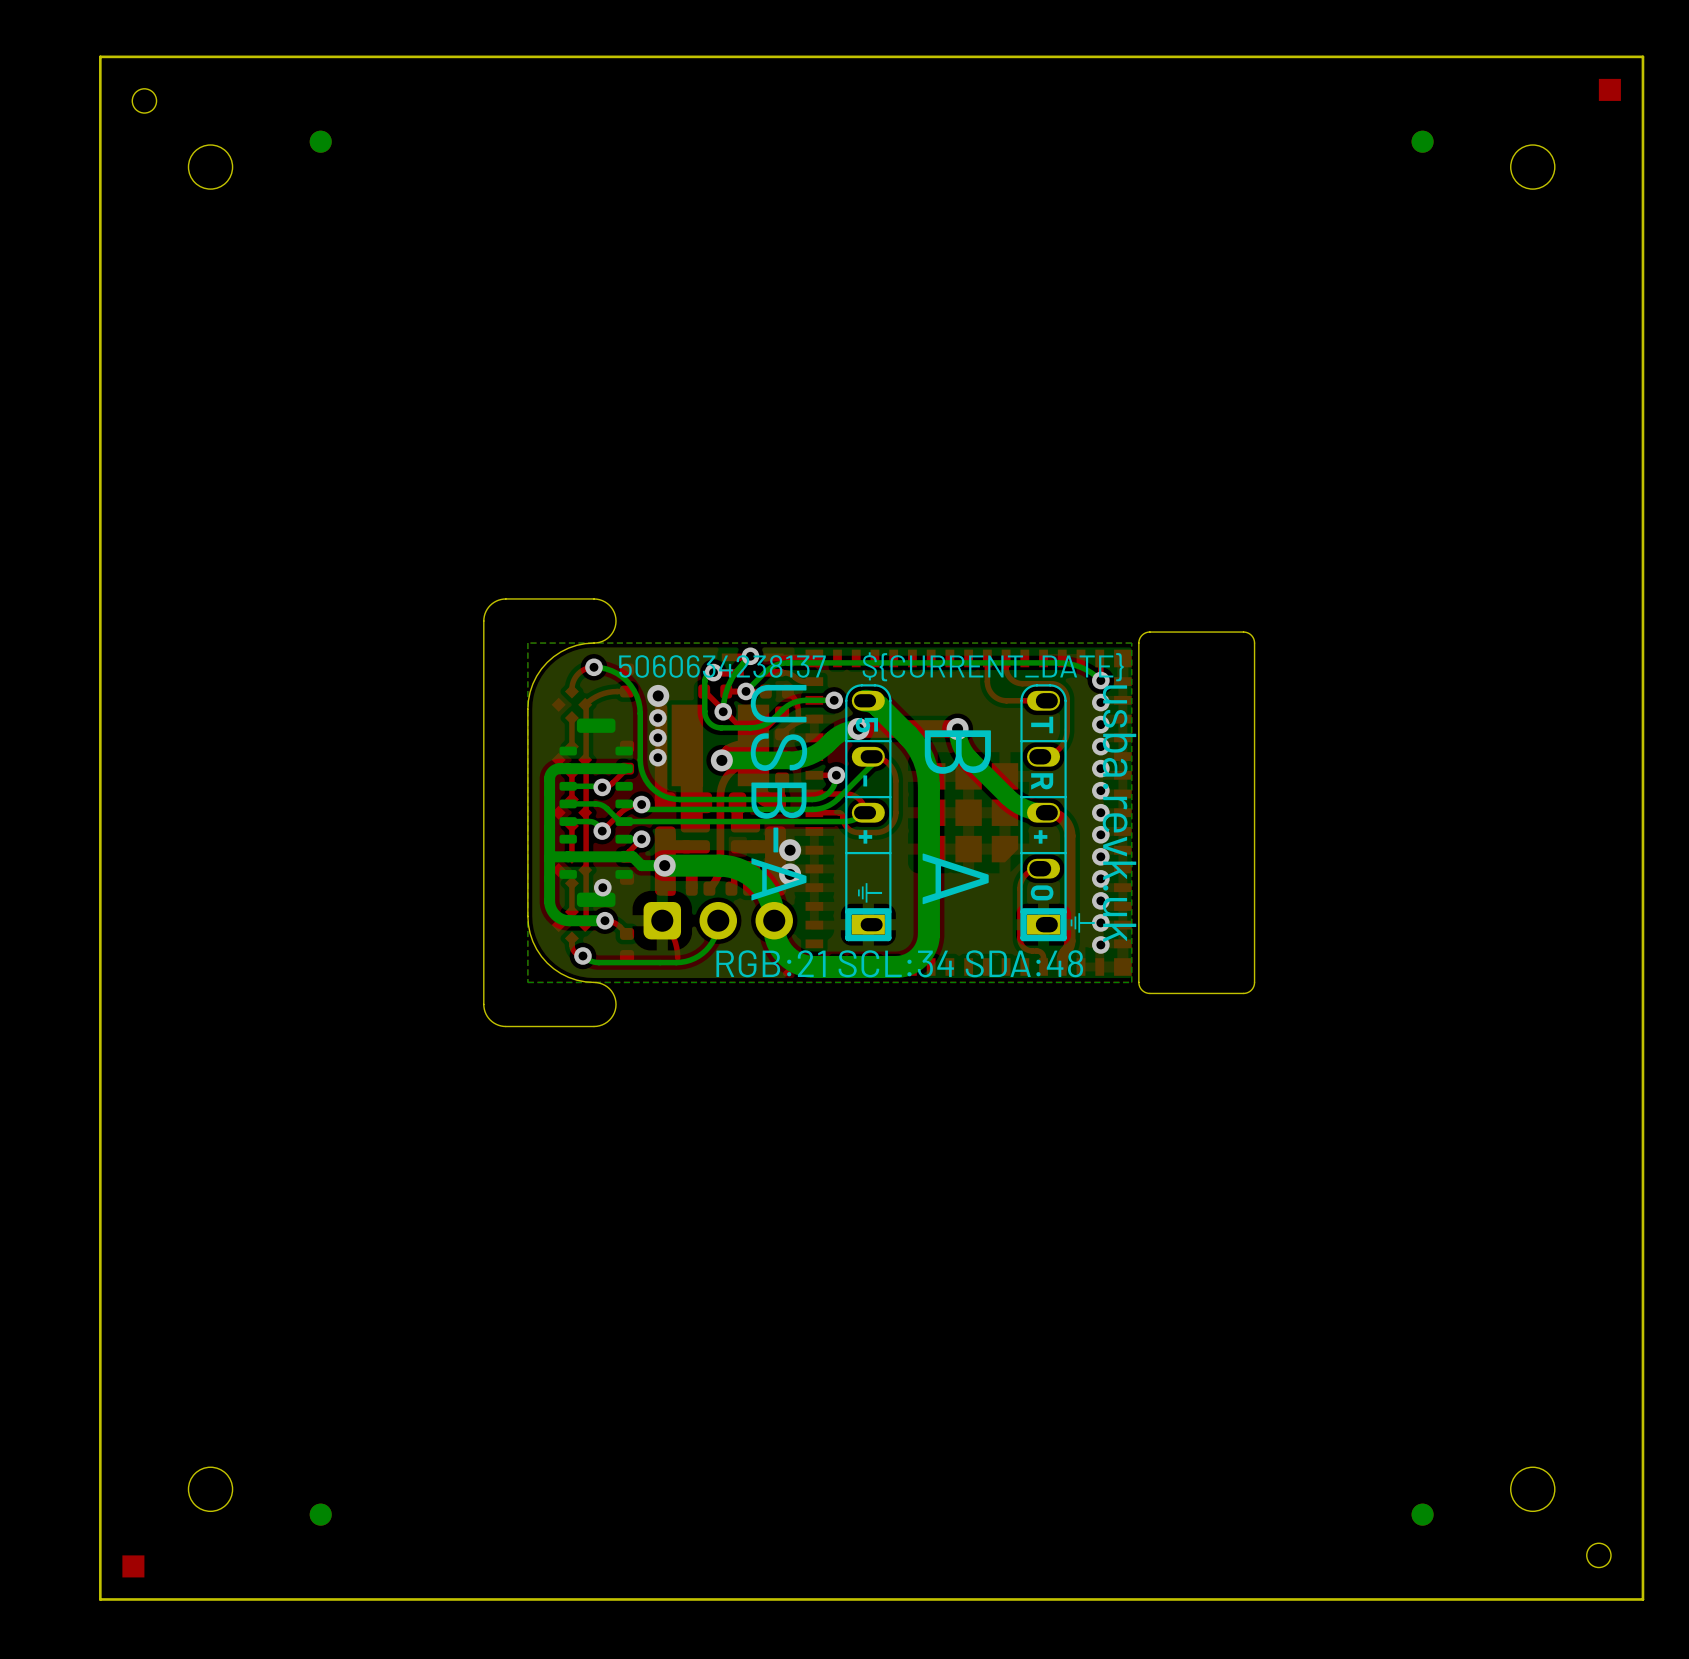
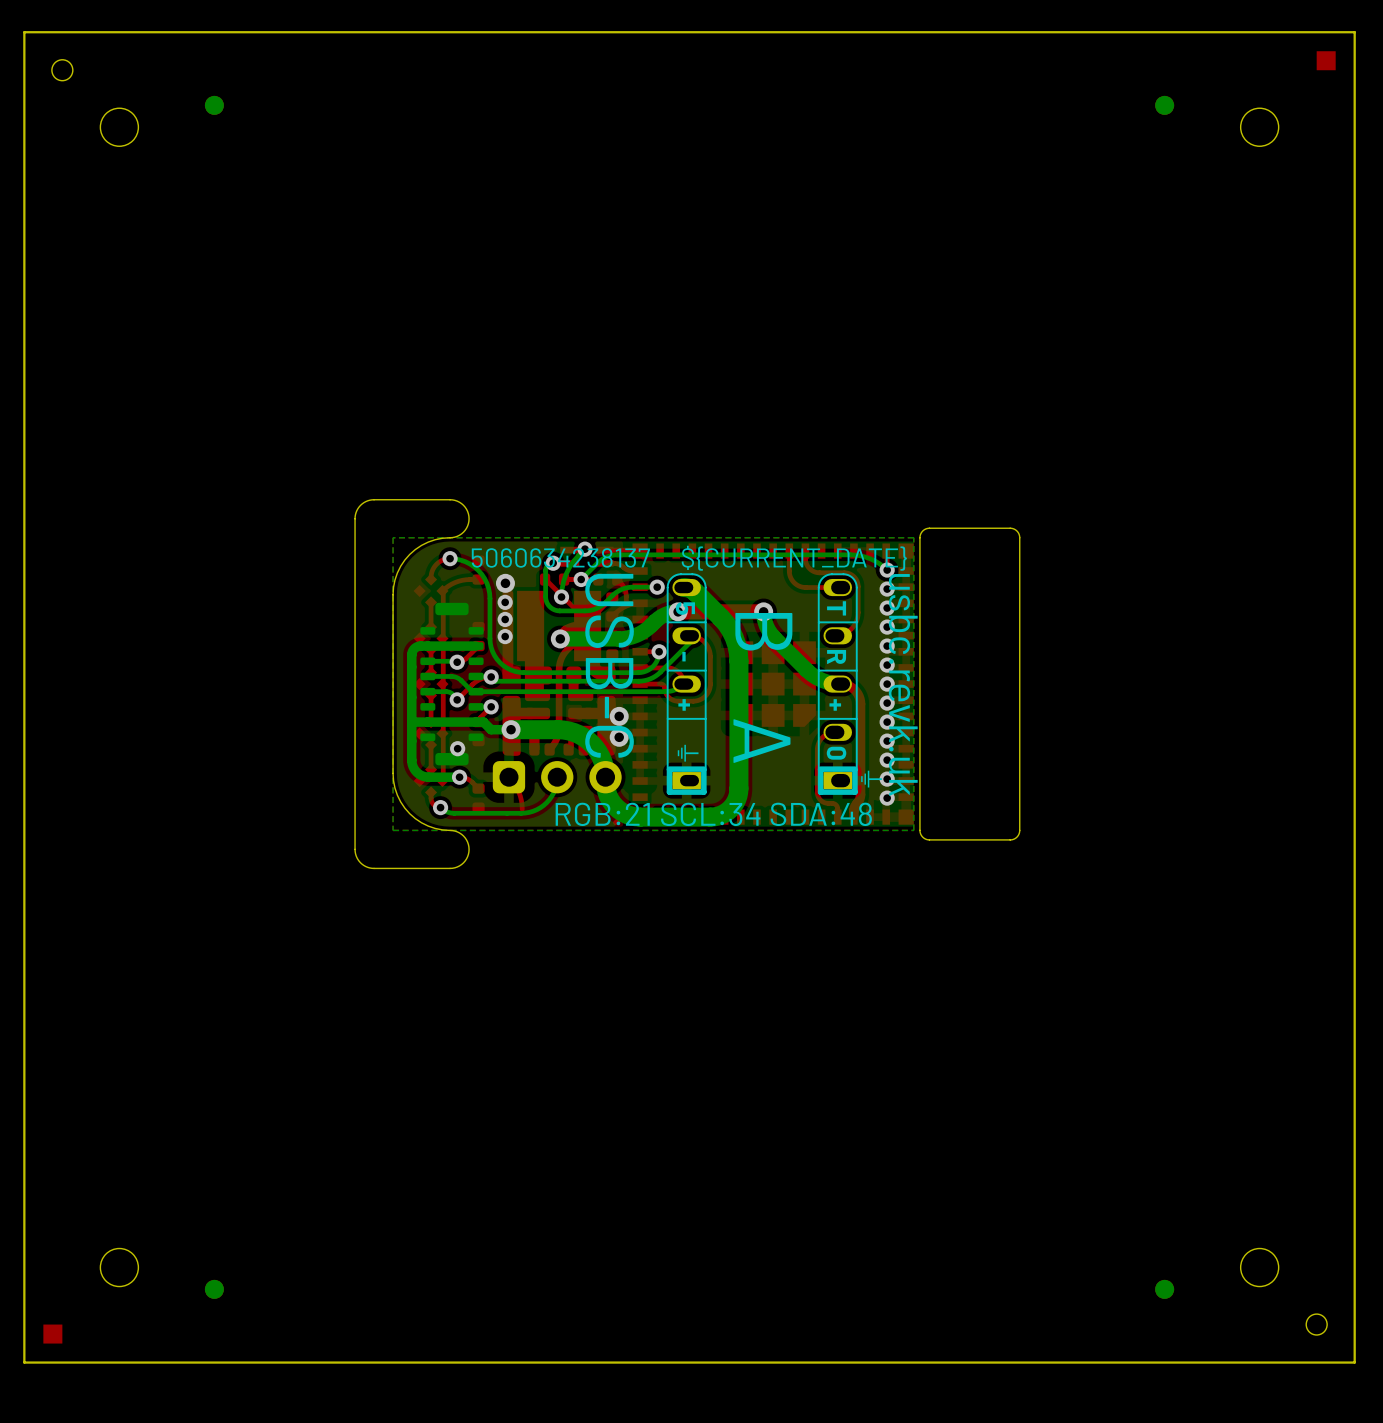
text: USB-A (778, 792) -> USB-C (609, 665)
text: usba.revk.uk (1119, 813) -> usbc.revk.uk (903, 684)

